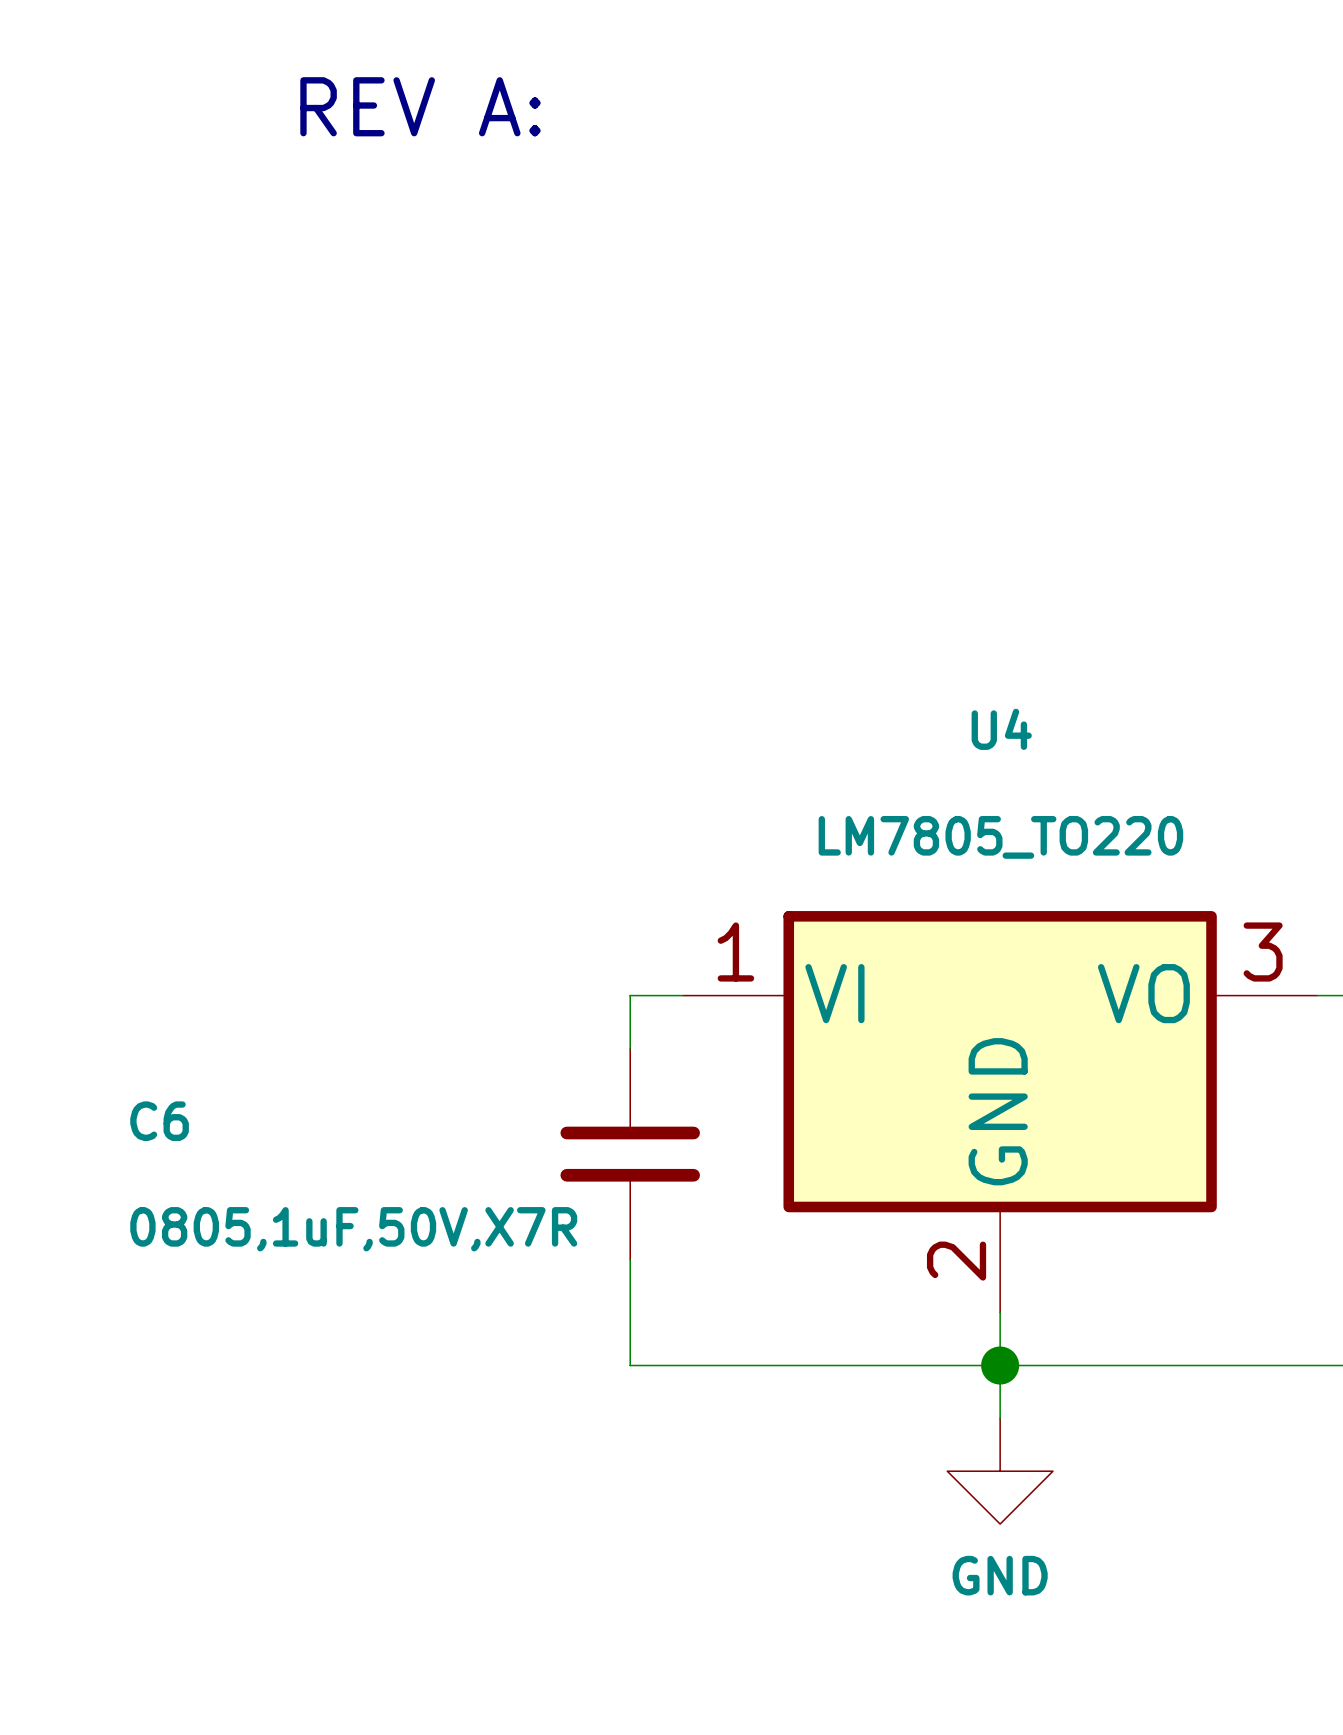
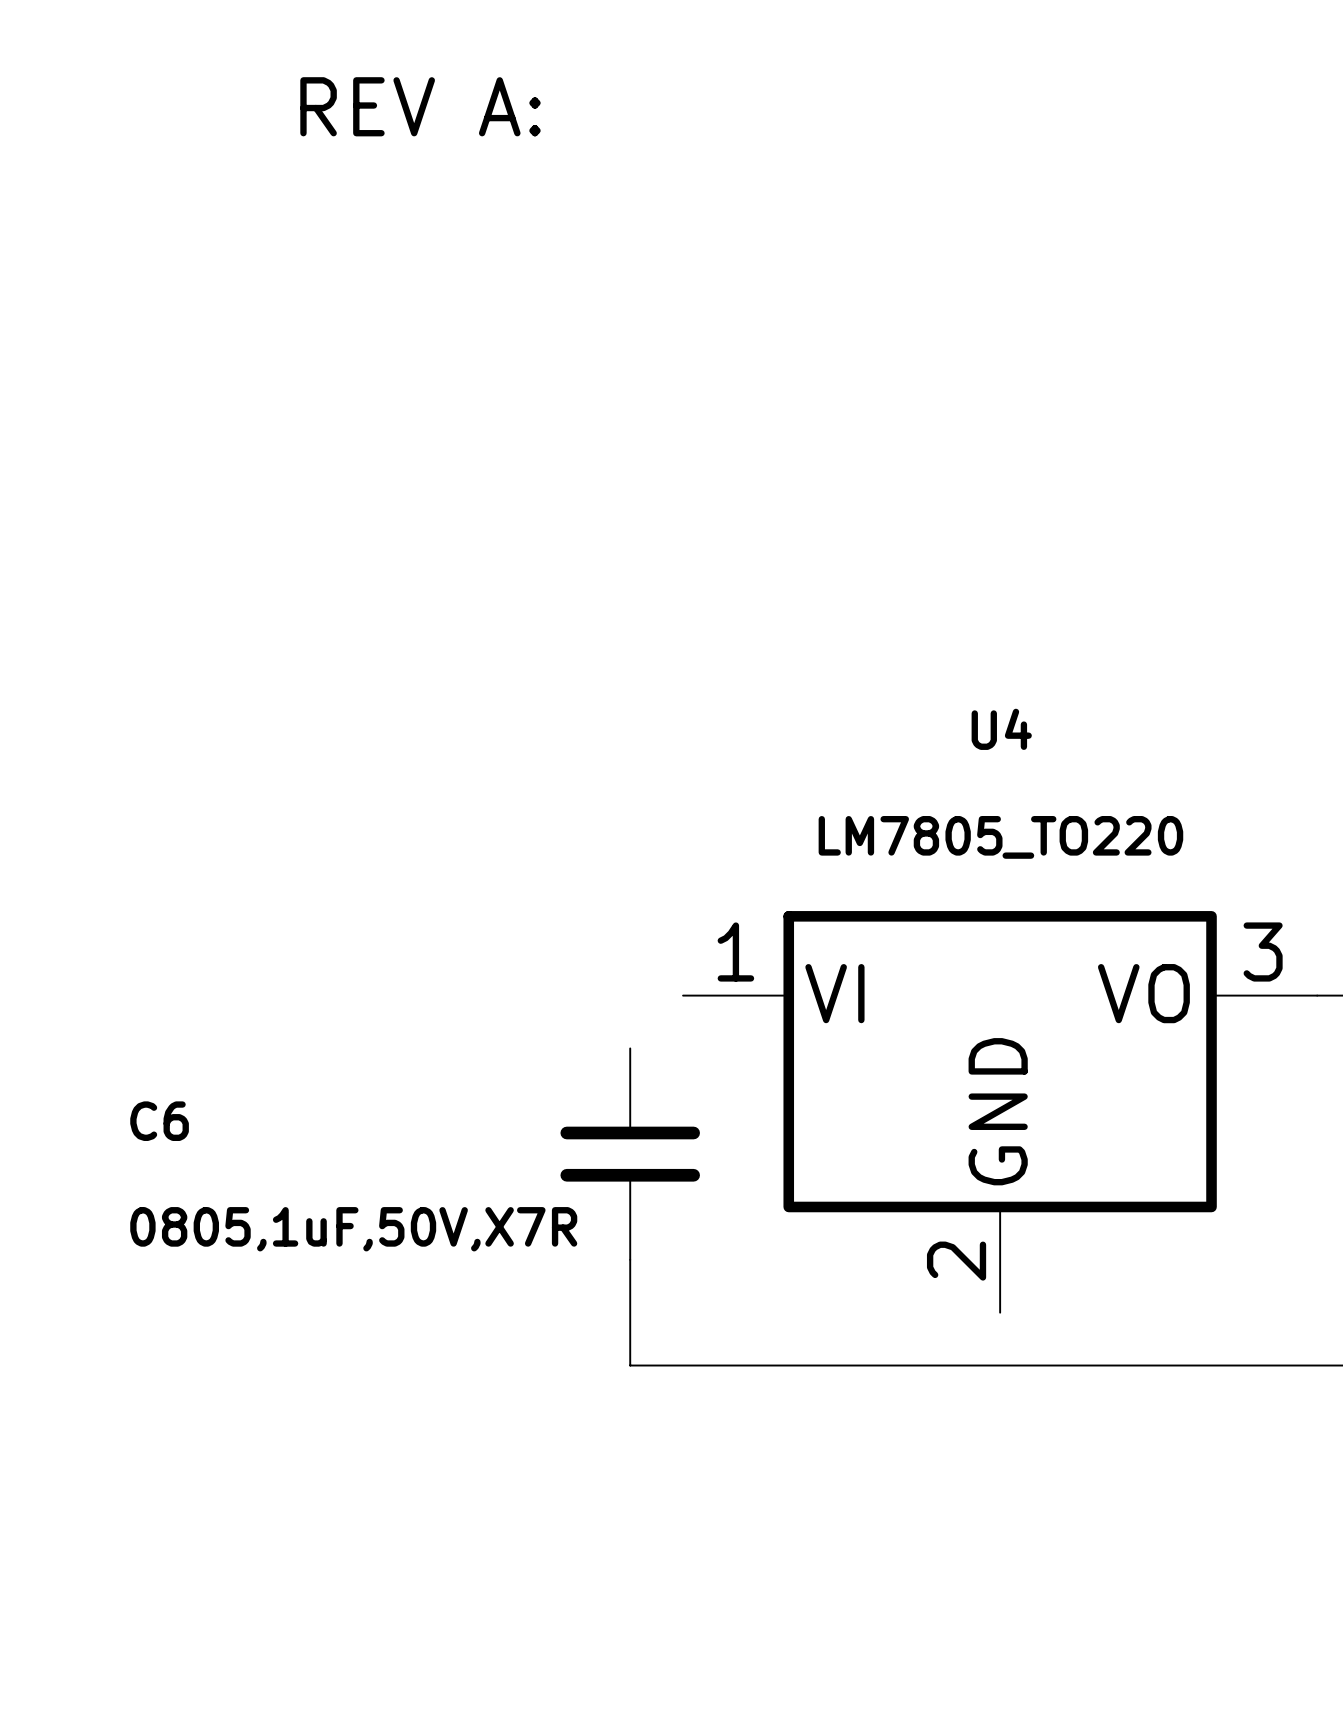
wire: (683, 995) (630, 995) (630, 1048) -> none
wire: (1000, 1312) (1000, 1418) -> none
junction: (1000, 1365) -> none
power symbol: GND (1000, 1471) -> none

